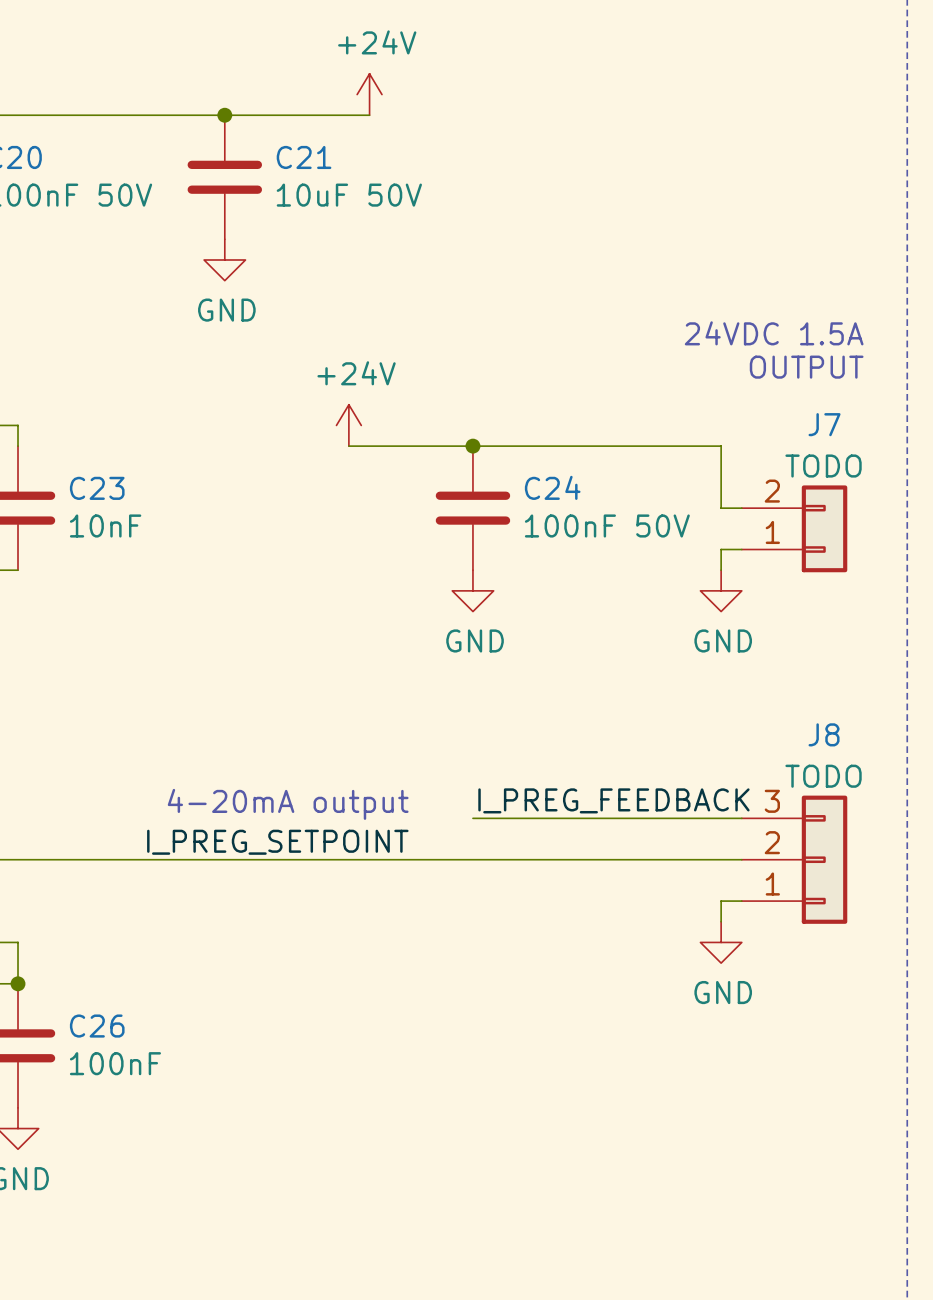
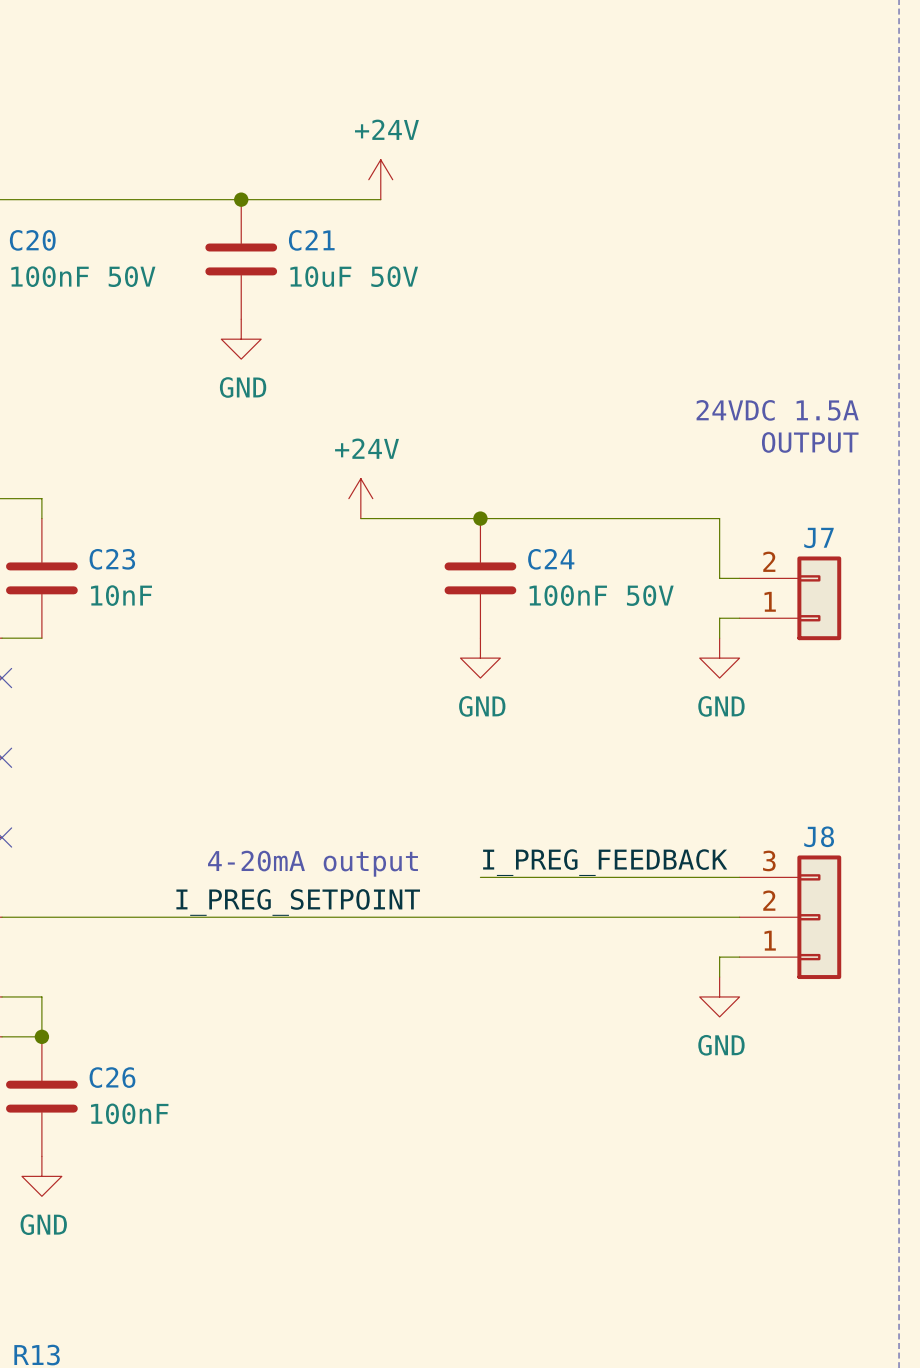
J7 name position: J7 (824, 424) -> J7 (818, 537)
J7 value: TODO (823, 466) -> none
J8 name position: J8 (824, 734) -> J8 (819, 836)
J8 value: TODO (823, 776) -> none

